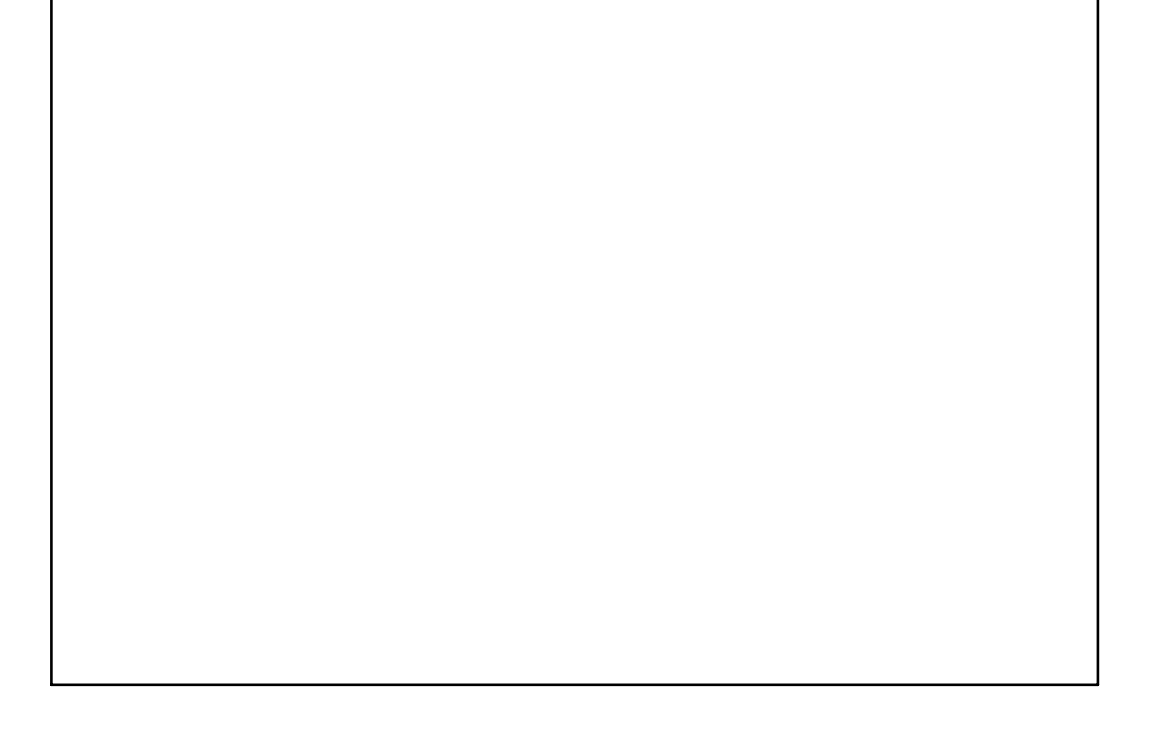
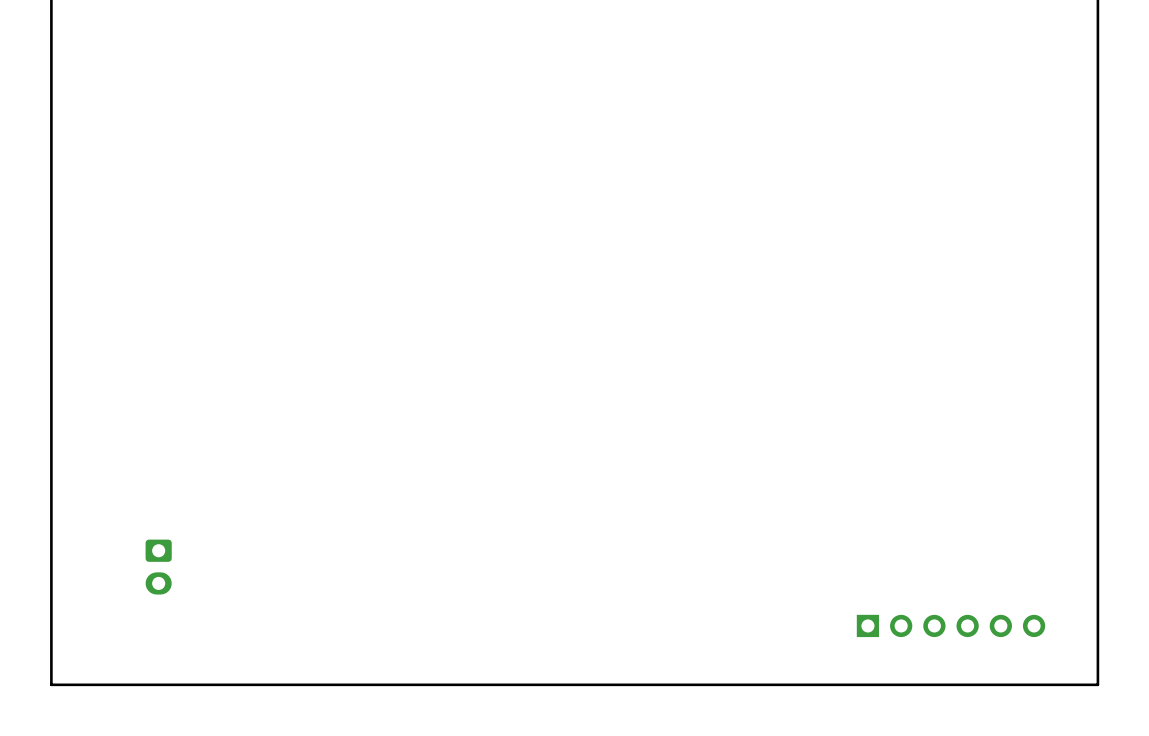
part: none -> (158, 567)
part: none -> (951, 625)

